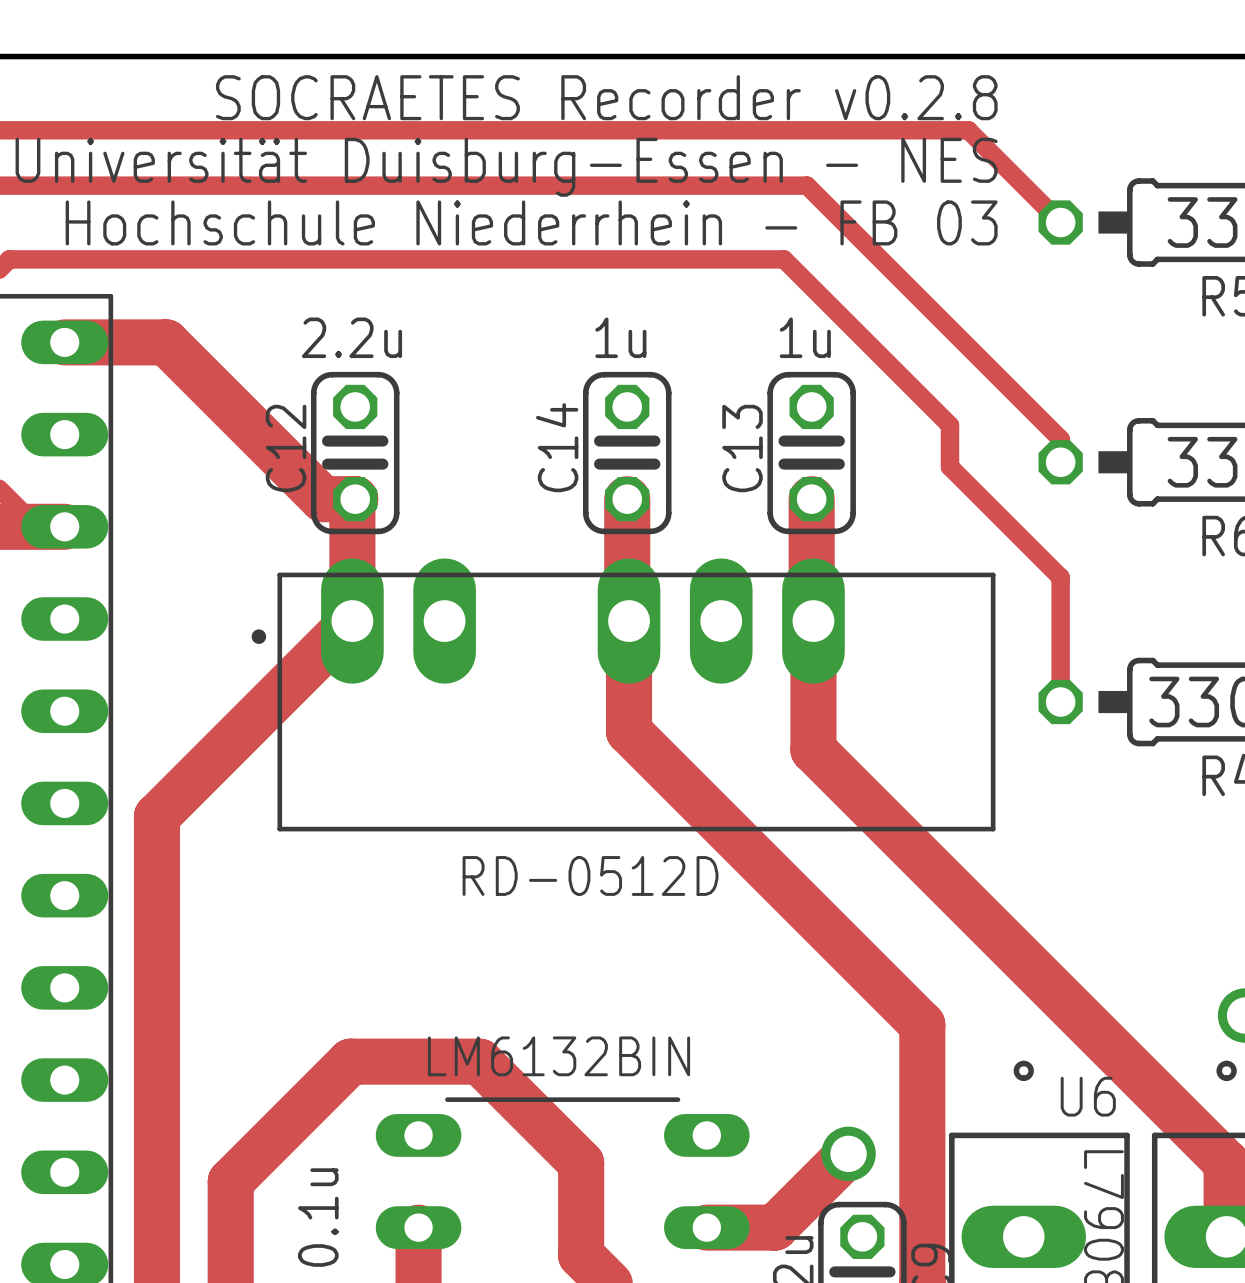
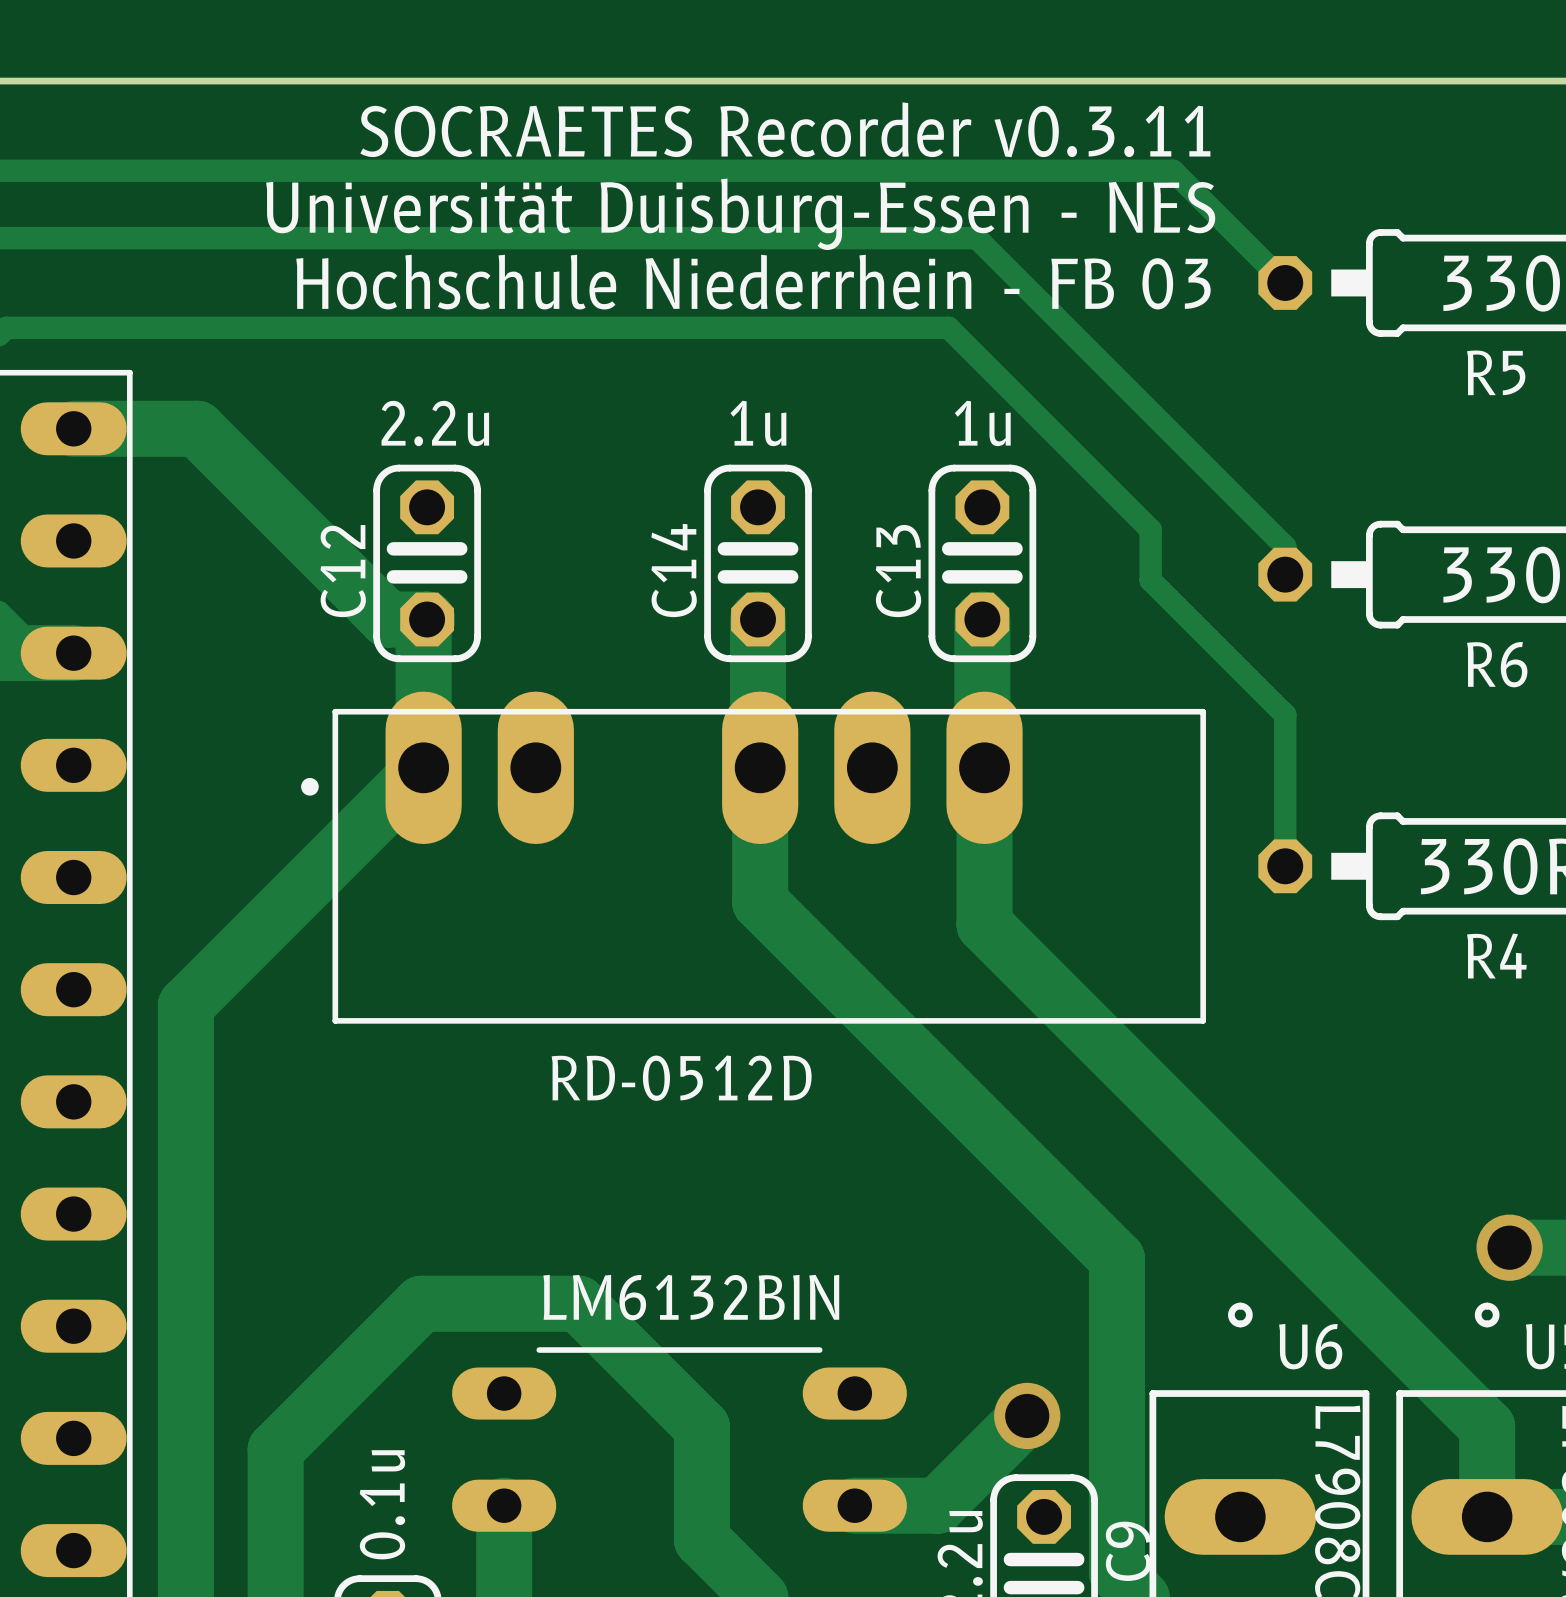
text: SOCRAETES Recorder v0.2.8 (606, 97) -> SOCRAETES Recorder v0.3.11 (785, 129)

